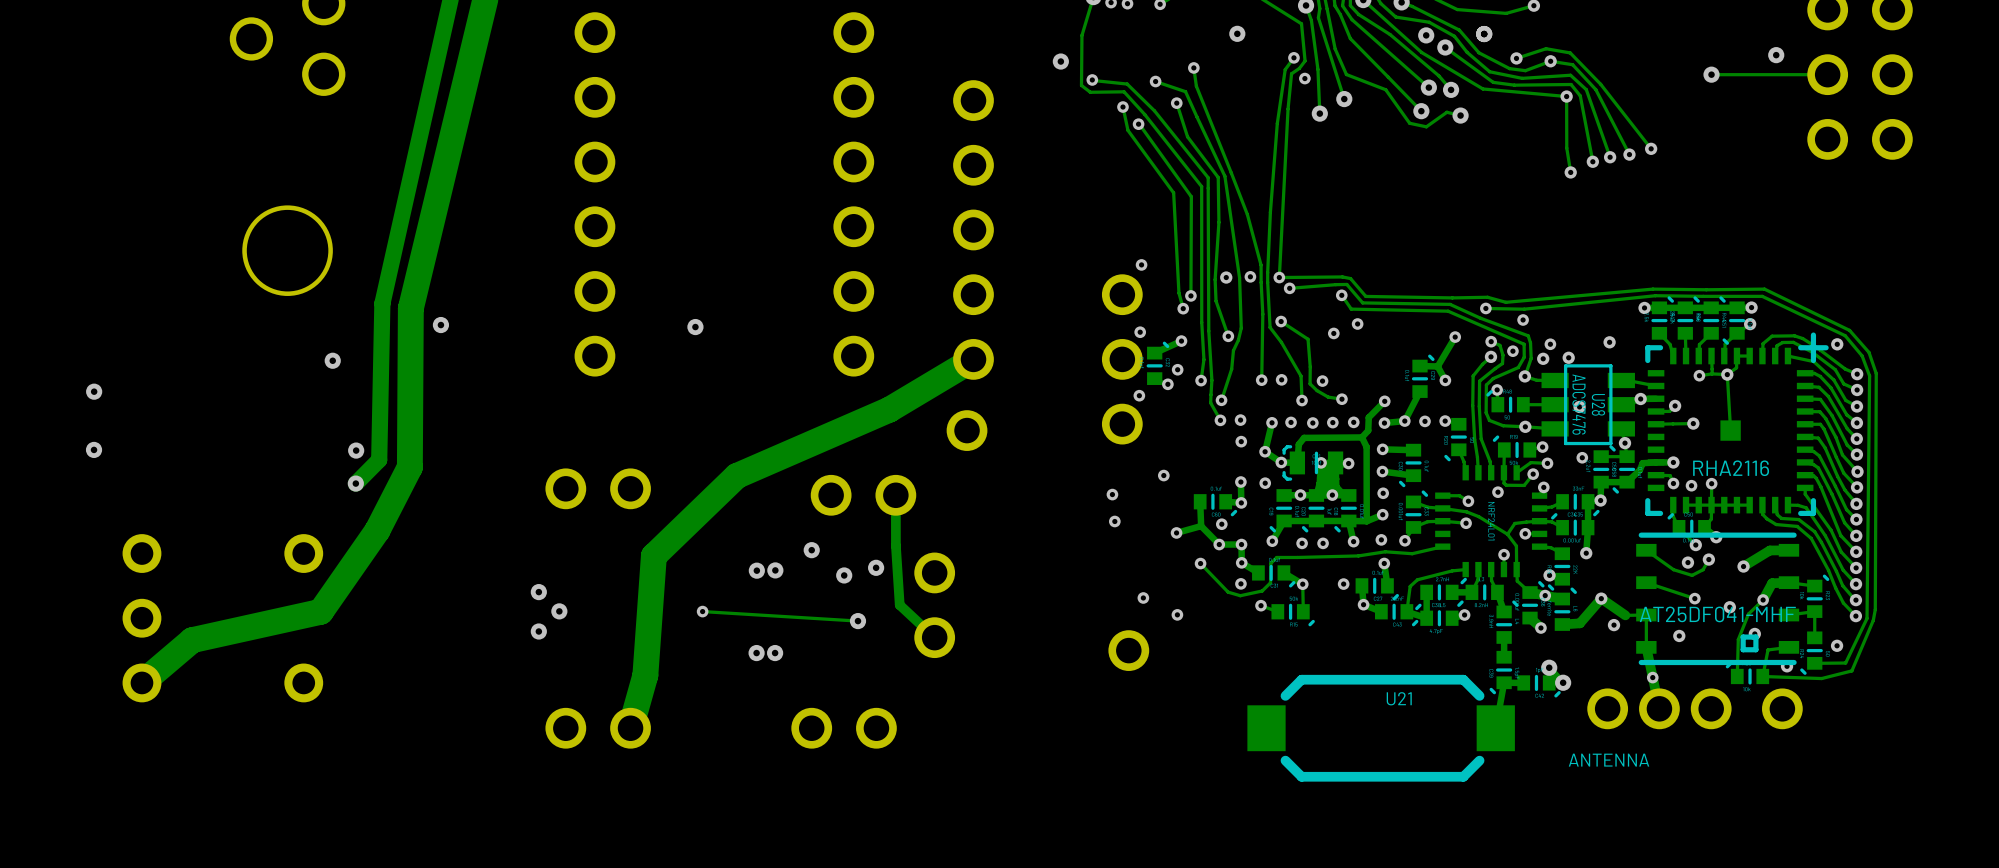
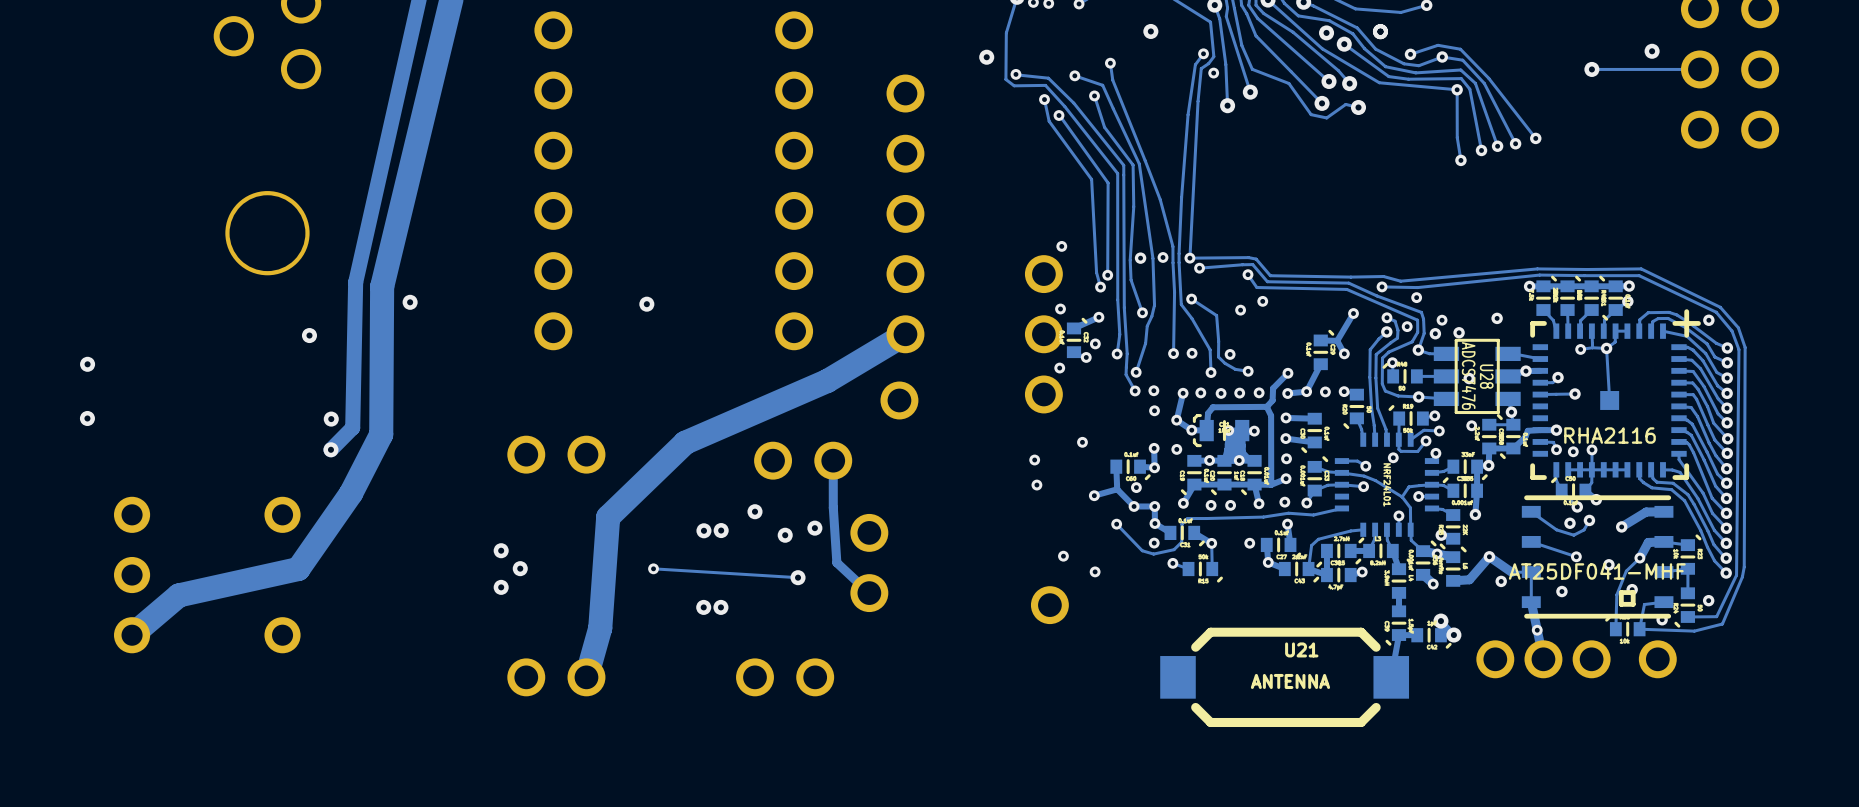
U21 value position: ANTENNA (1609, 760) -> ANTENNA (1290, 681)

